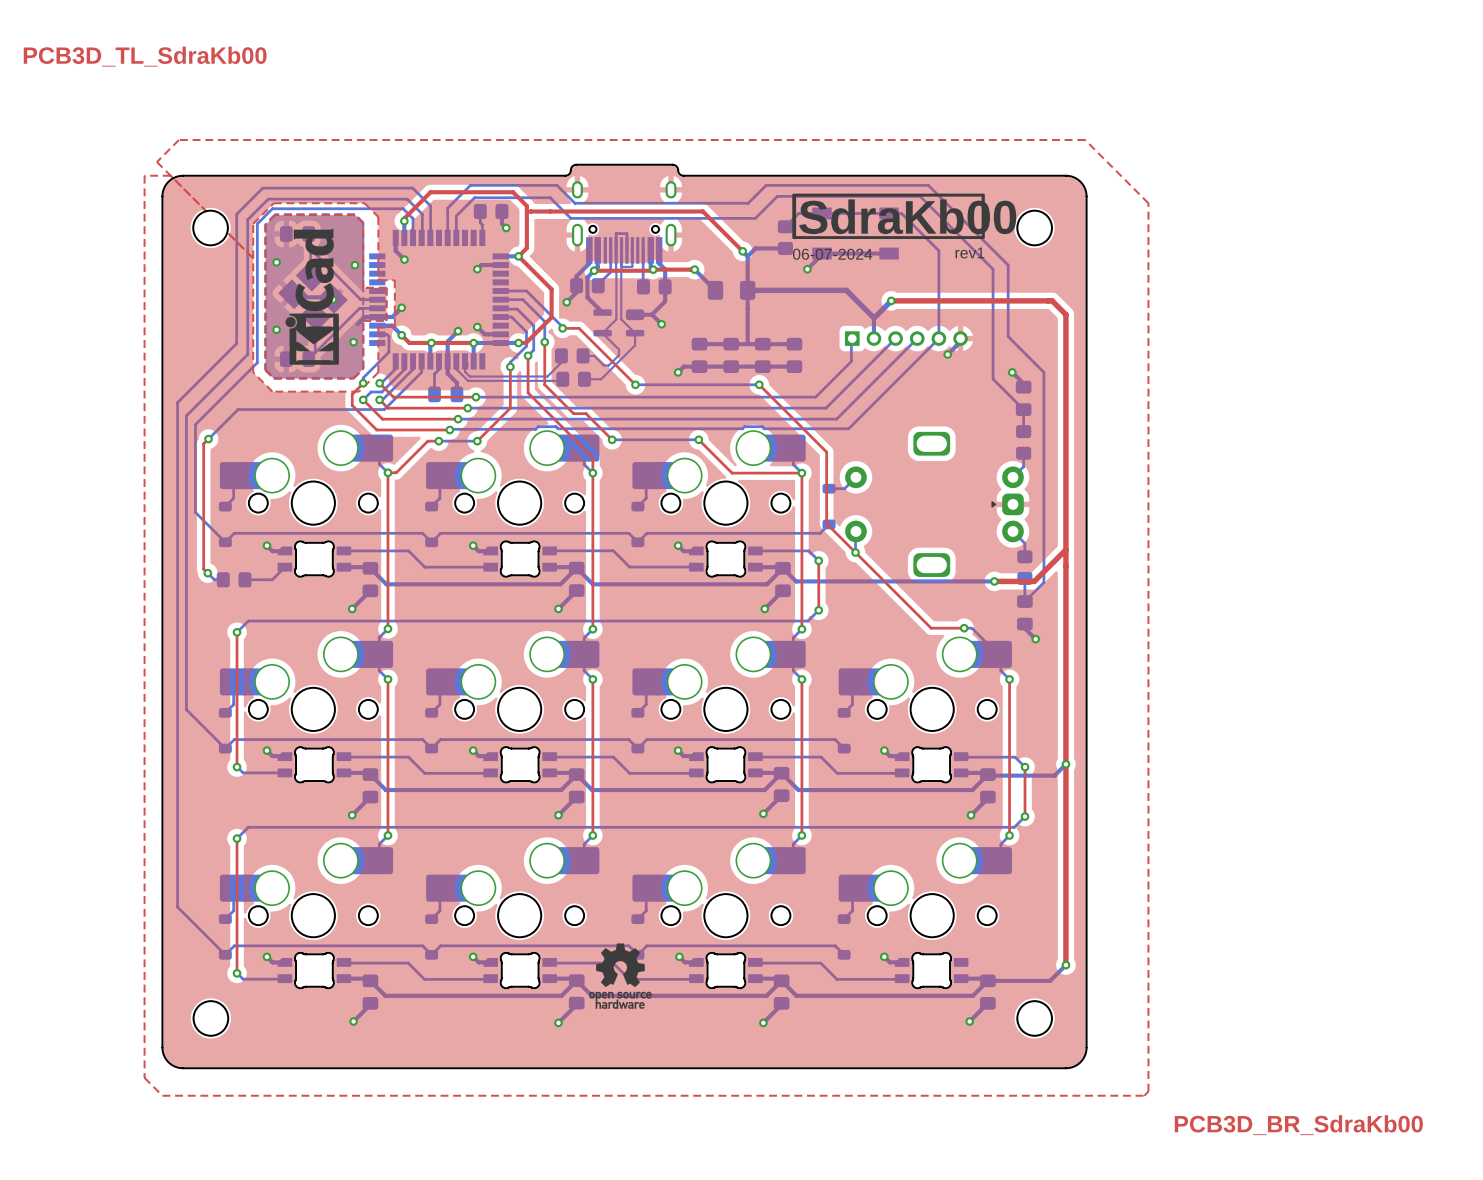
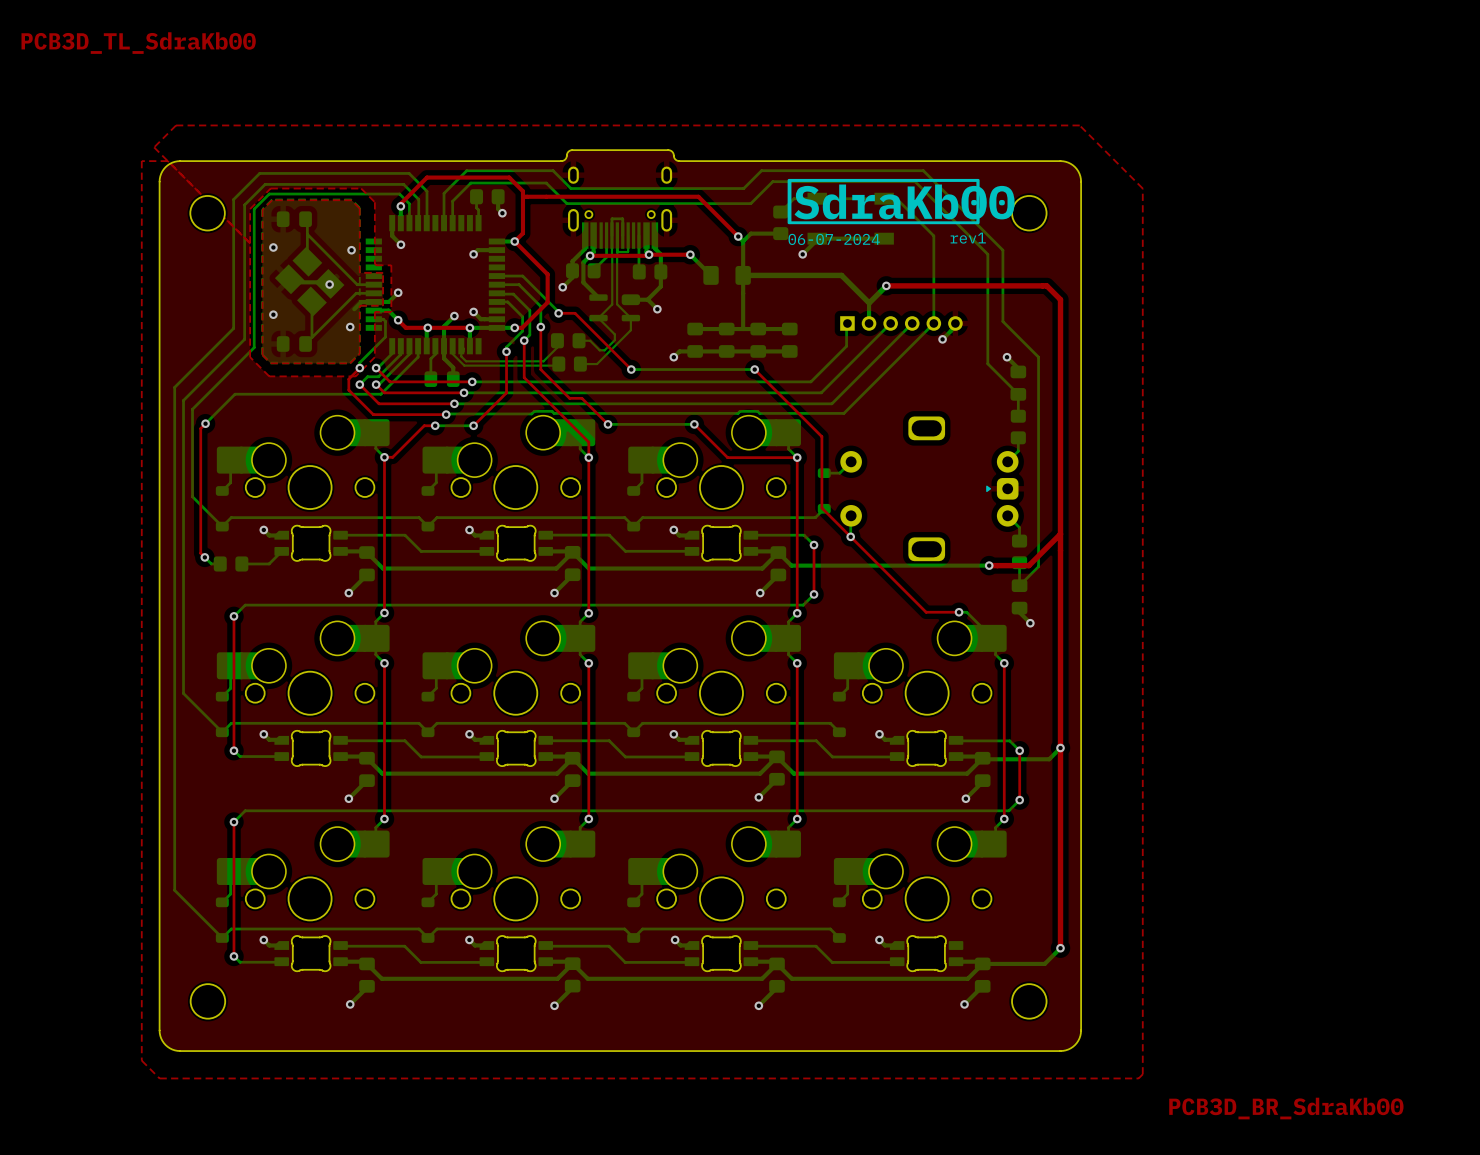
drawing: [285, 228, 339, 365] -> none
drawing: [589, 943, 652, 1009] -> none

